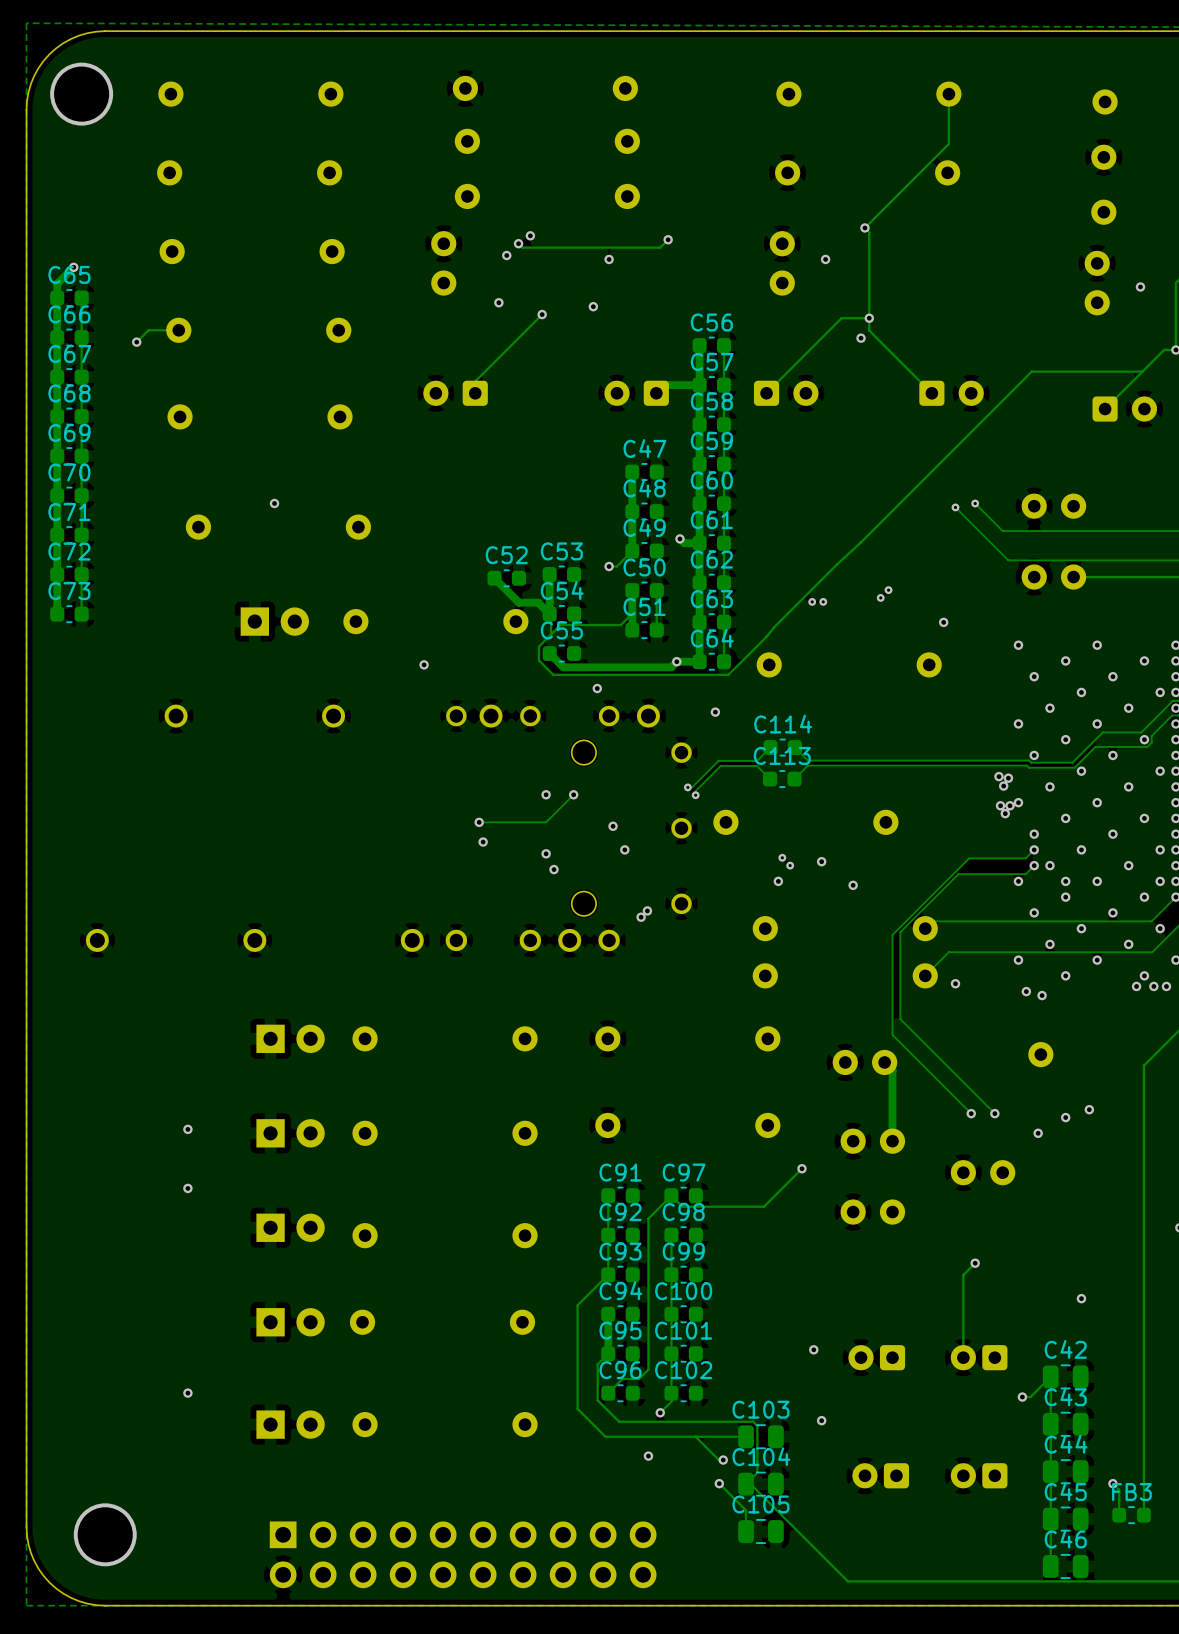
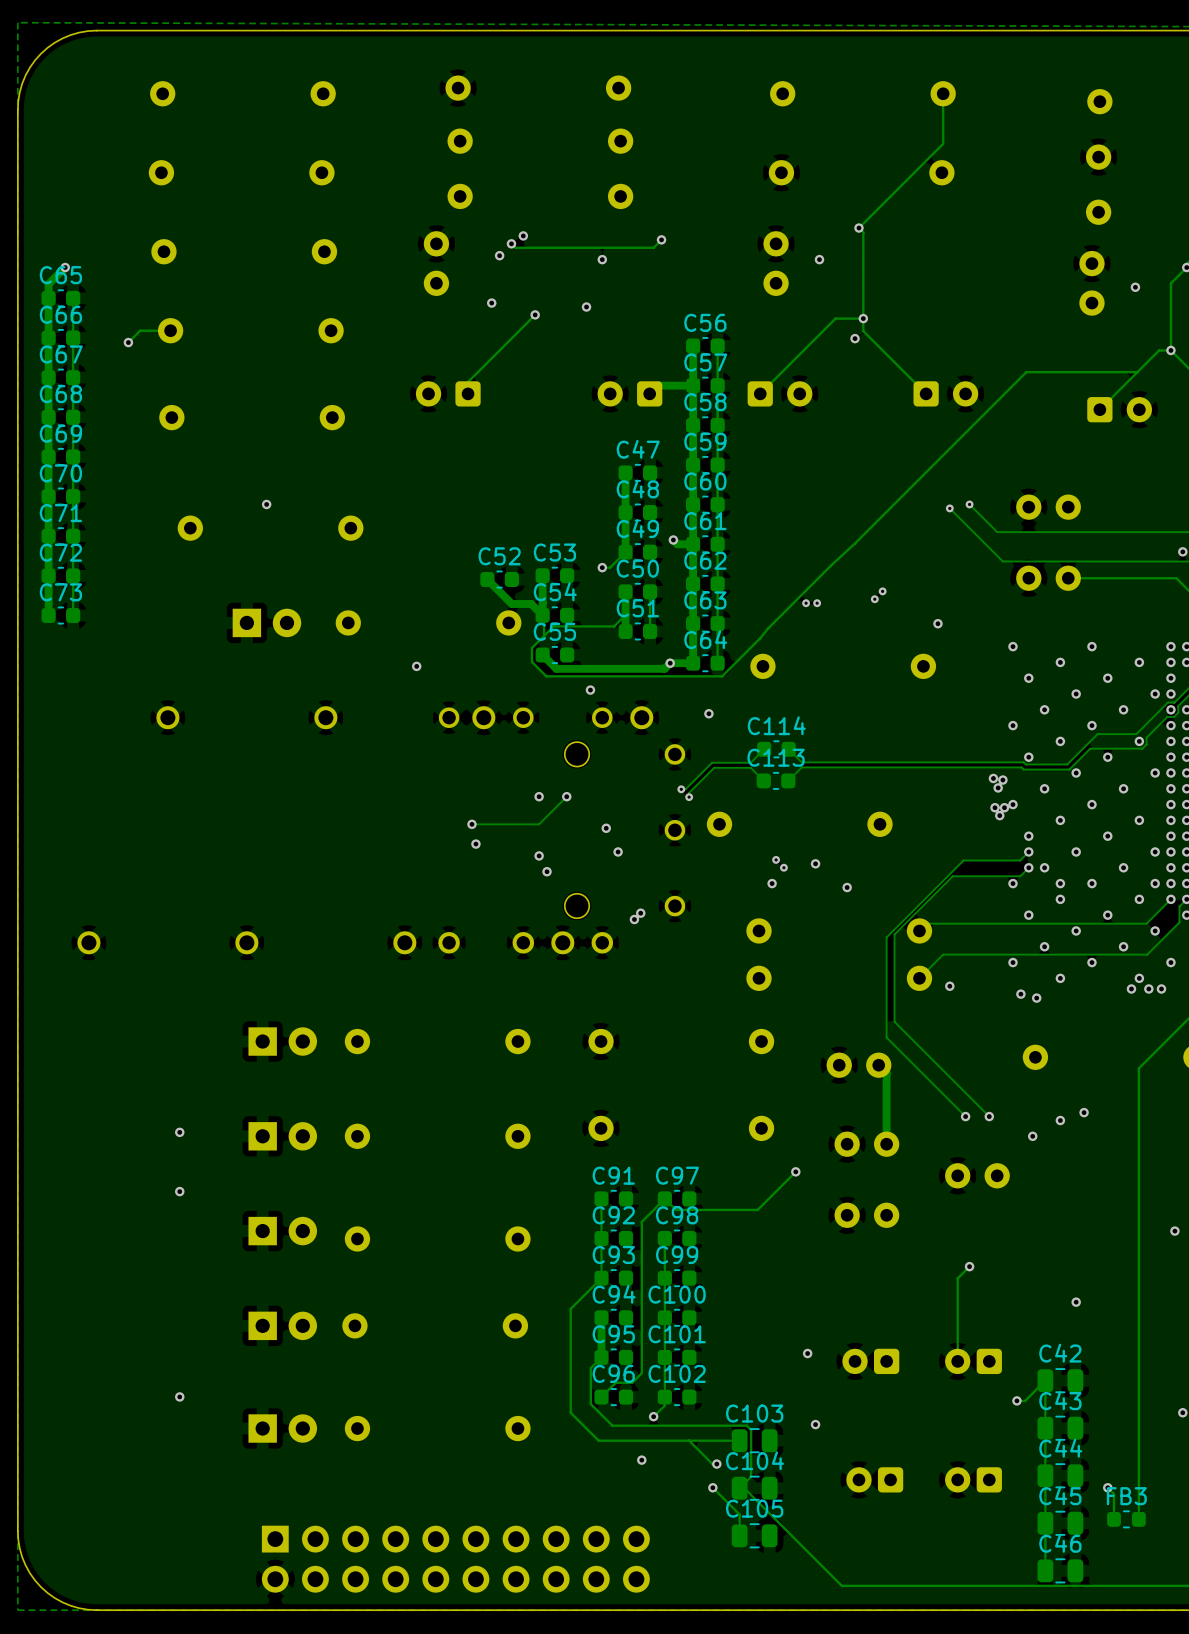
via: (81, 94) -> none
via: (105, 1534) -> none

